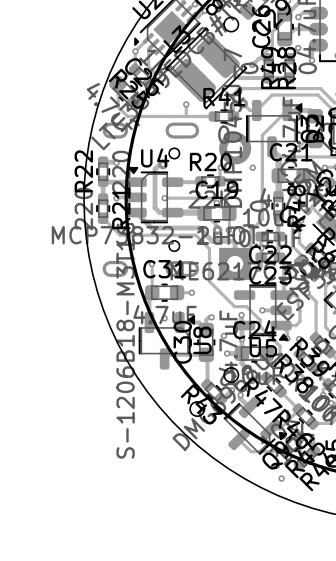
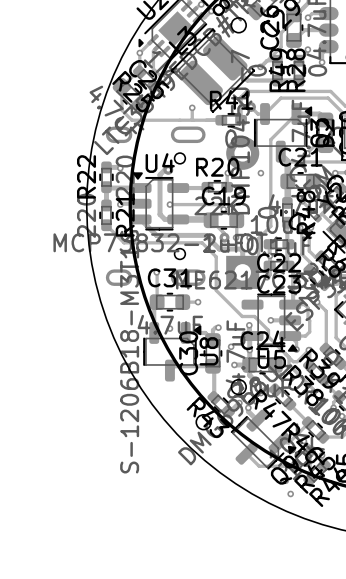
track: none -> (310, 348) (297, 361) (293, 361) (289, 357)

